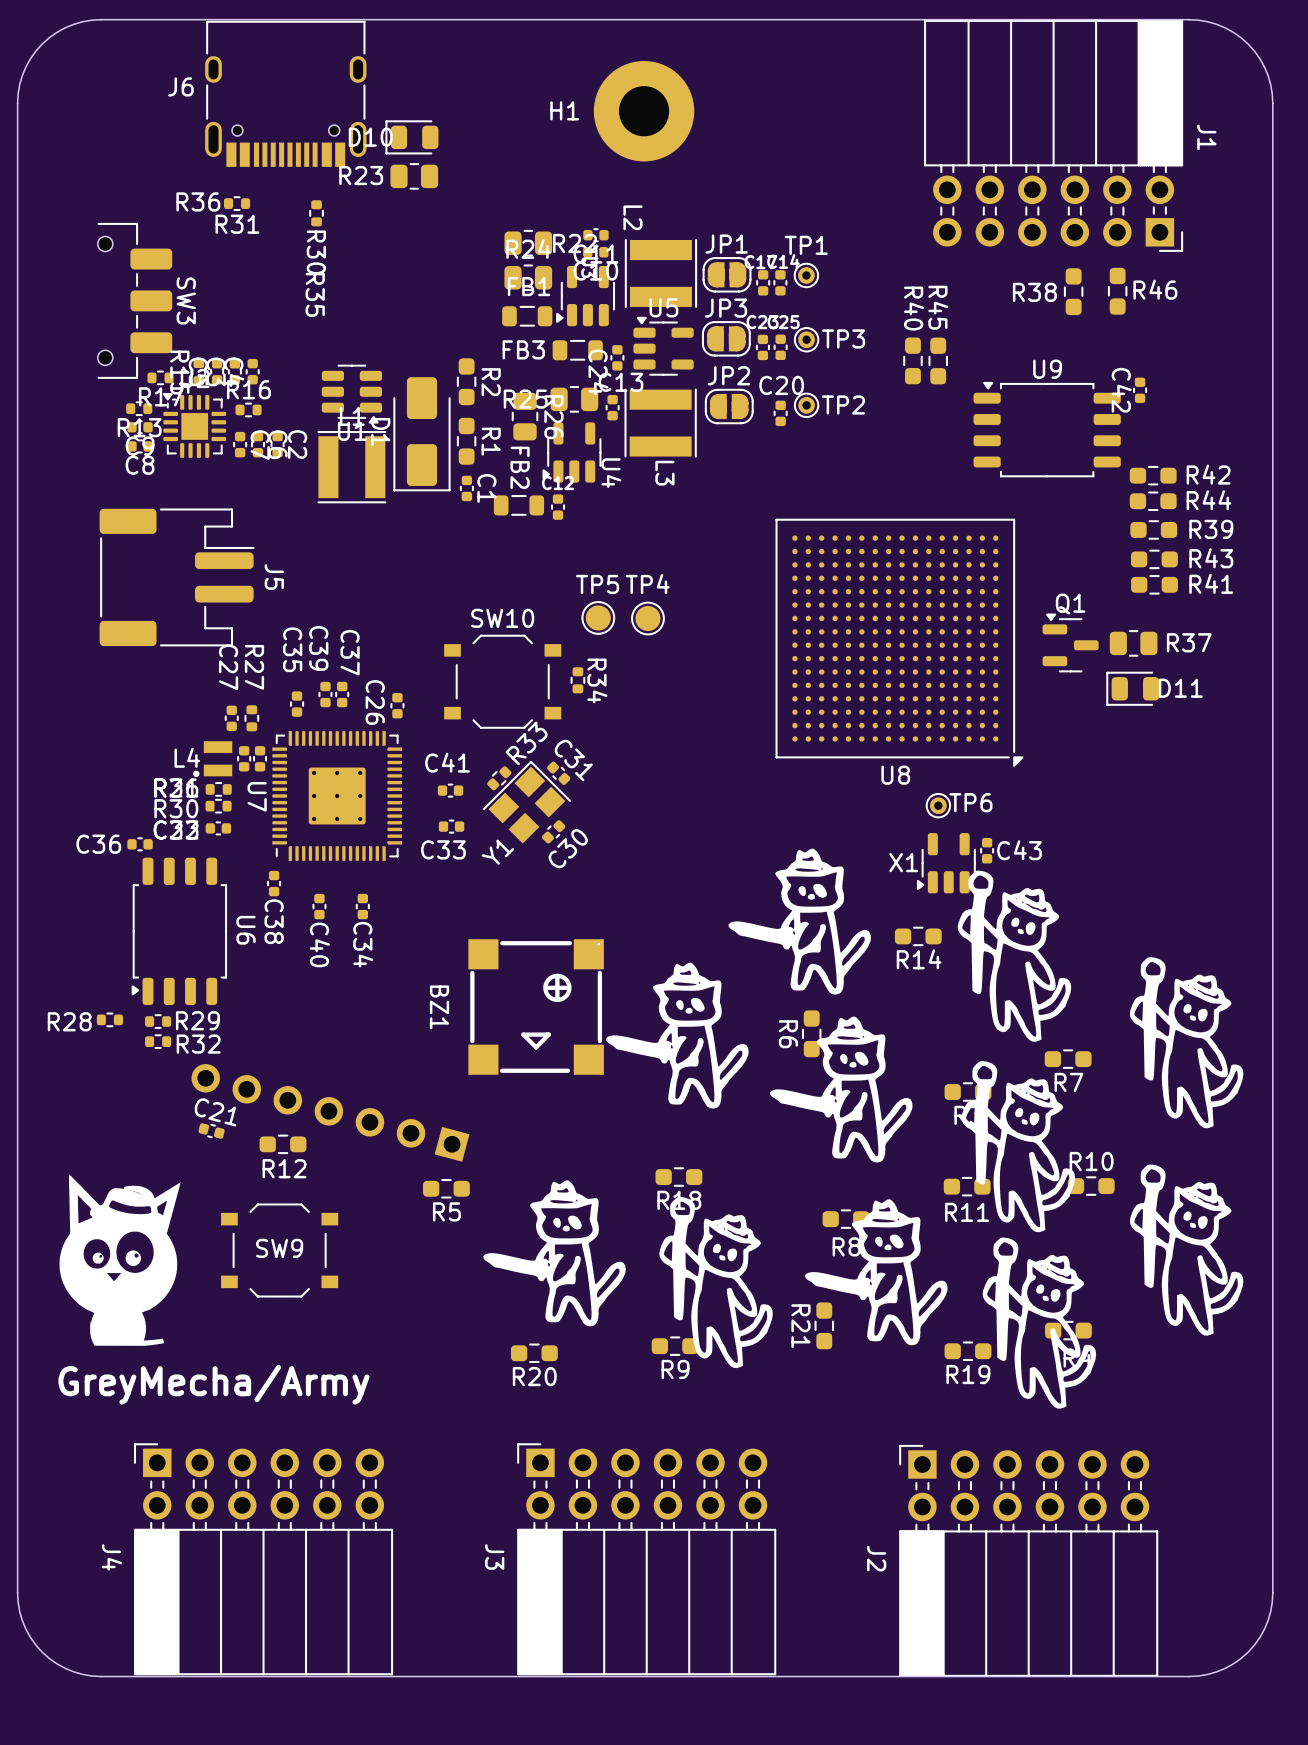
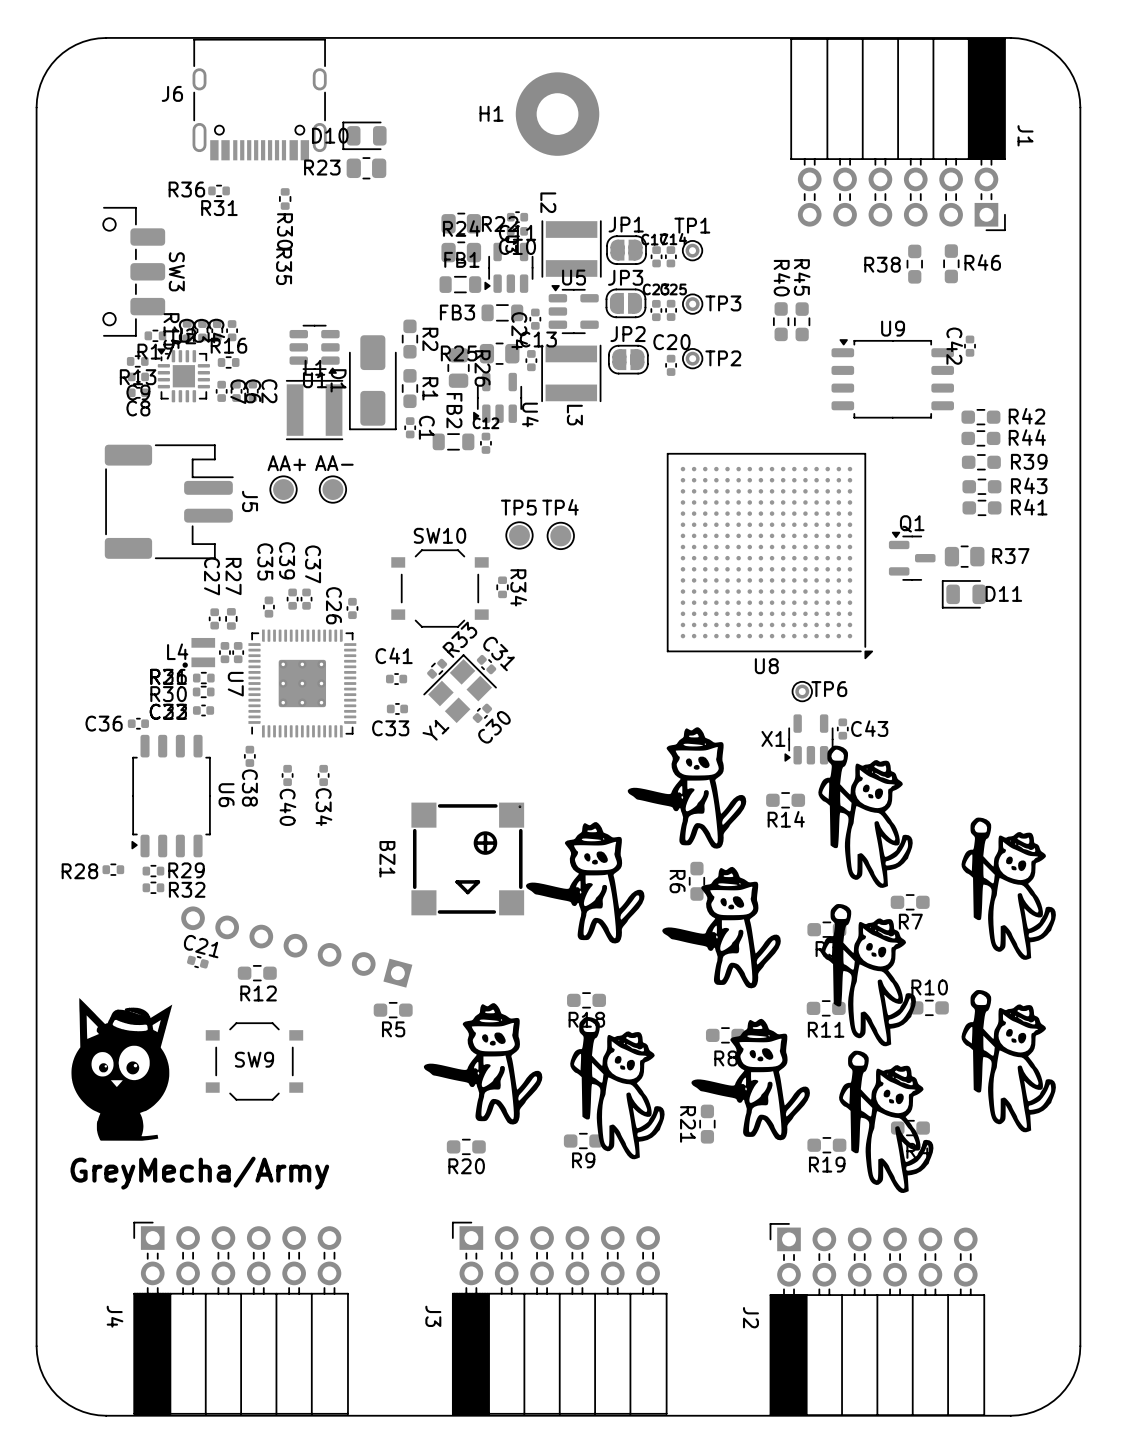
text: none -> AA- (334, 463)
text: none -> AA+ (286, 463)
part: none -> (283, 489)
part: none -> (332, 489)

